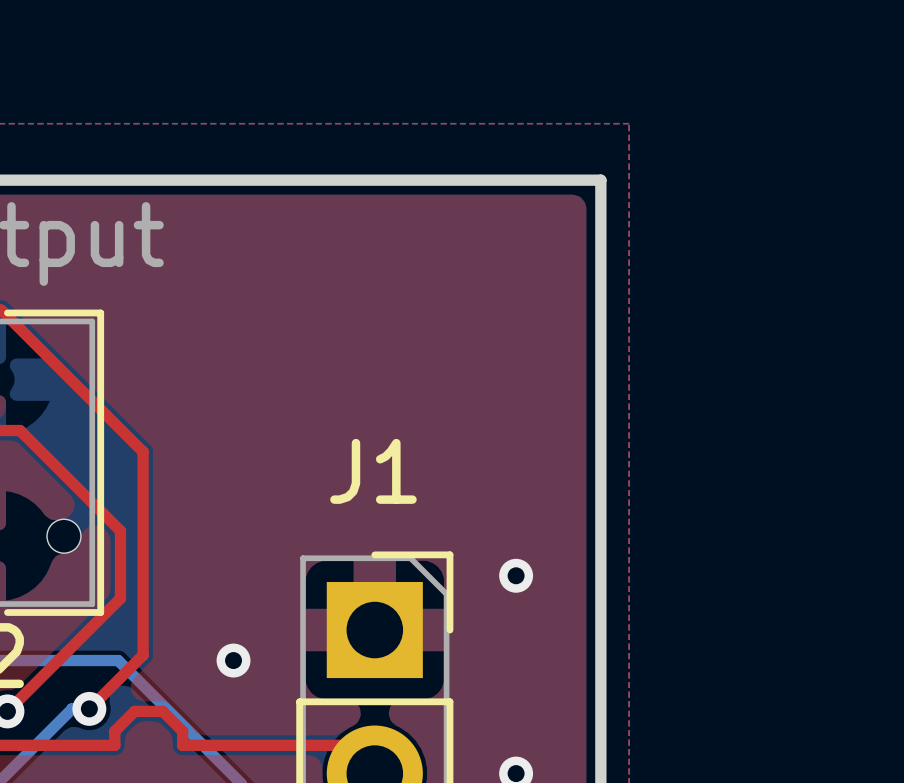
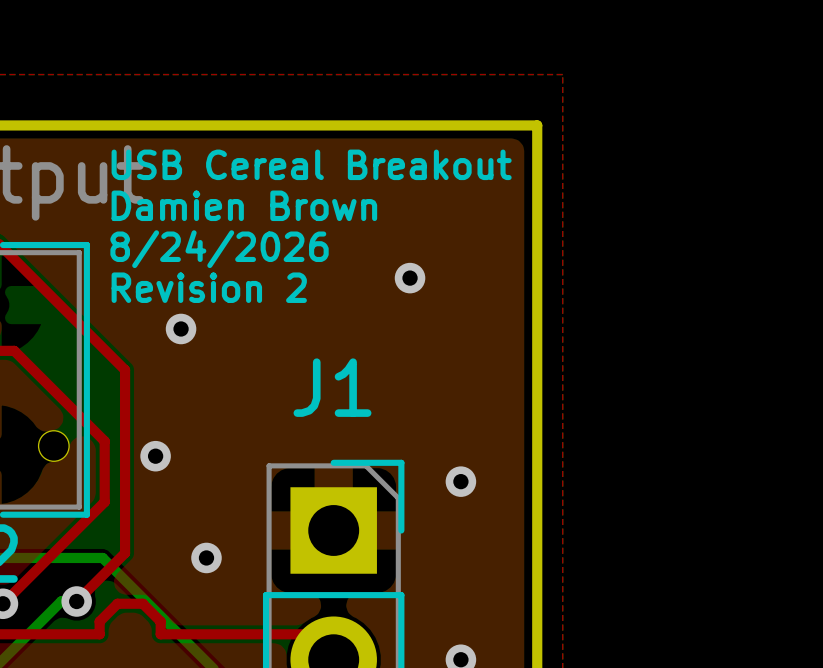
text: none -> USB Cereal Breakout (311, 164)
text: none -> Damien Brown (244, 205)
text: none -> 8/24/2026 (219, 249)
via: none -> (410, 278)
text: none -> Revision 2 (209, 287)
via: none -> (181, 328)
via: none -> (155, 456)

